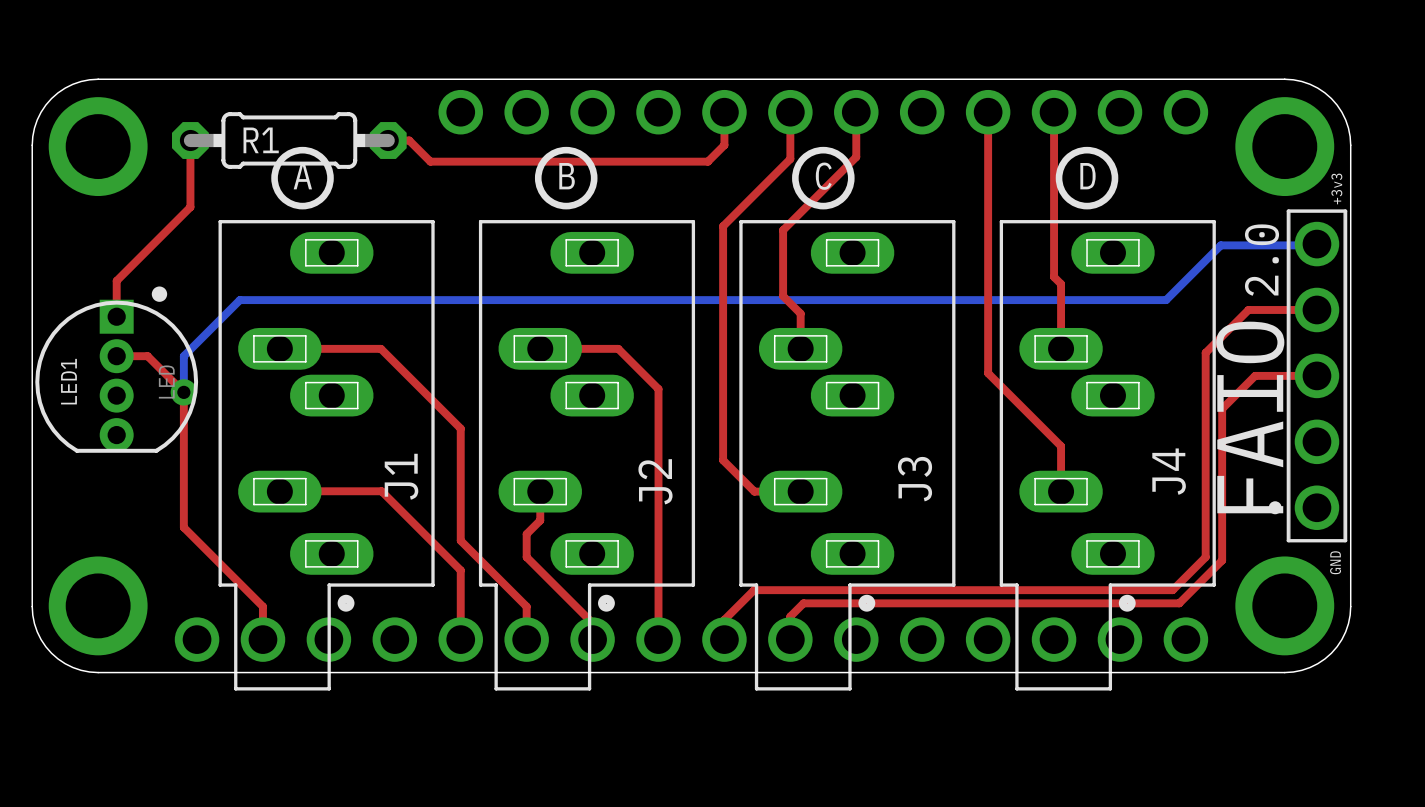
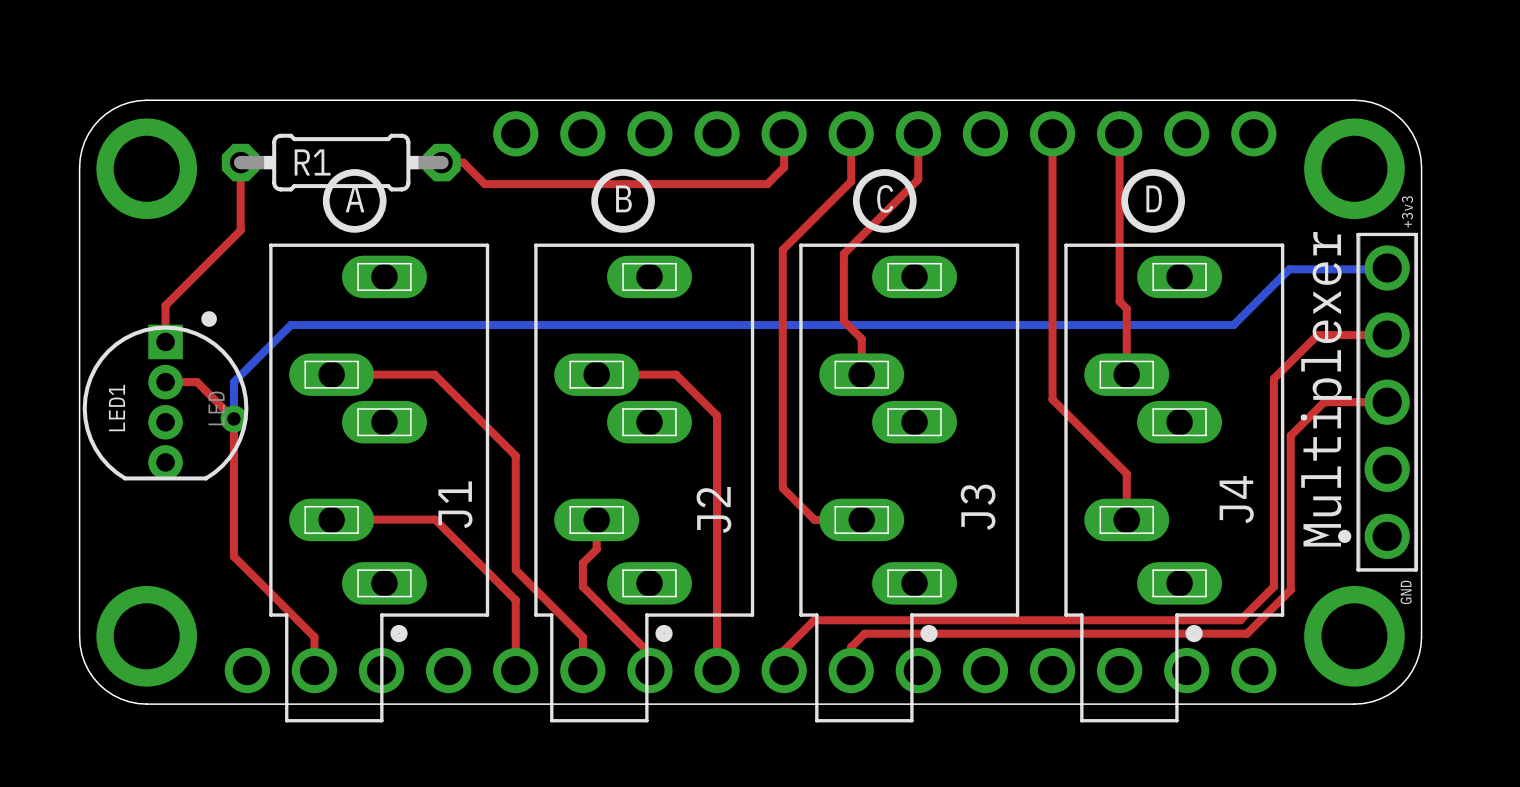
text: 2.0 (1262, 260) -> none
text: FAIO (1250, 417) -> Multiplexer (1326, 389)

